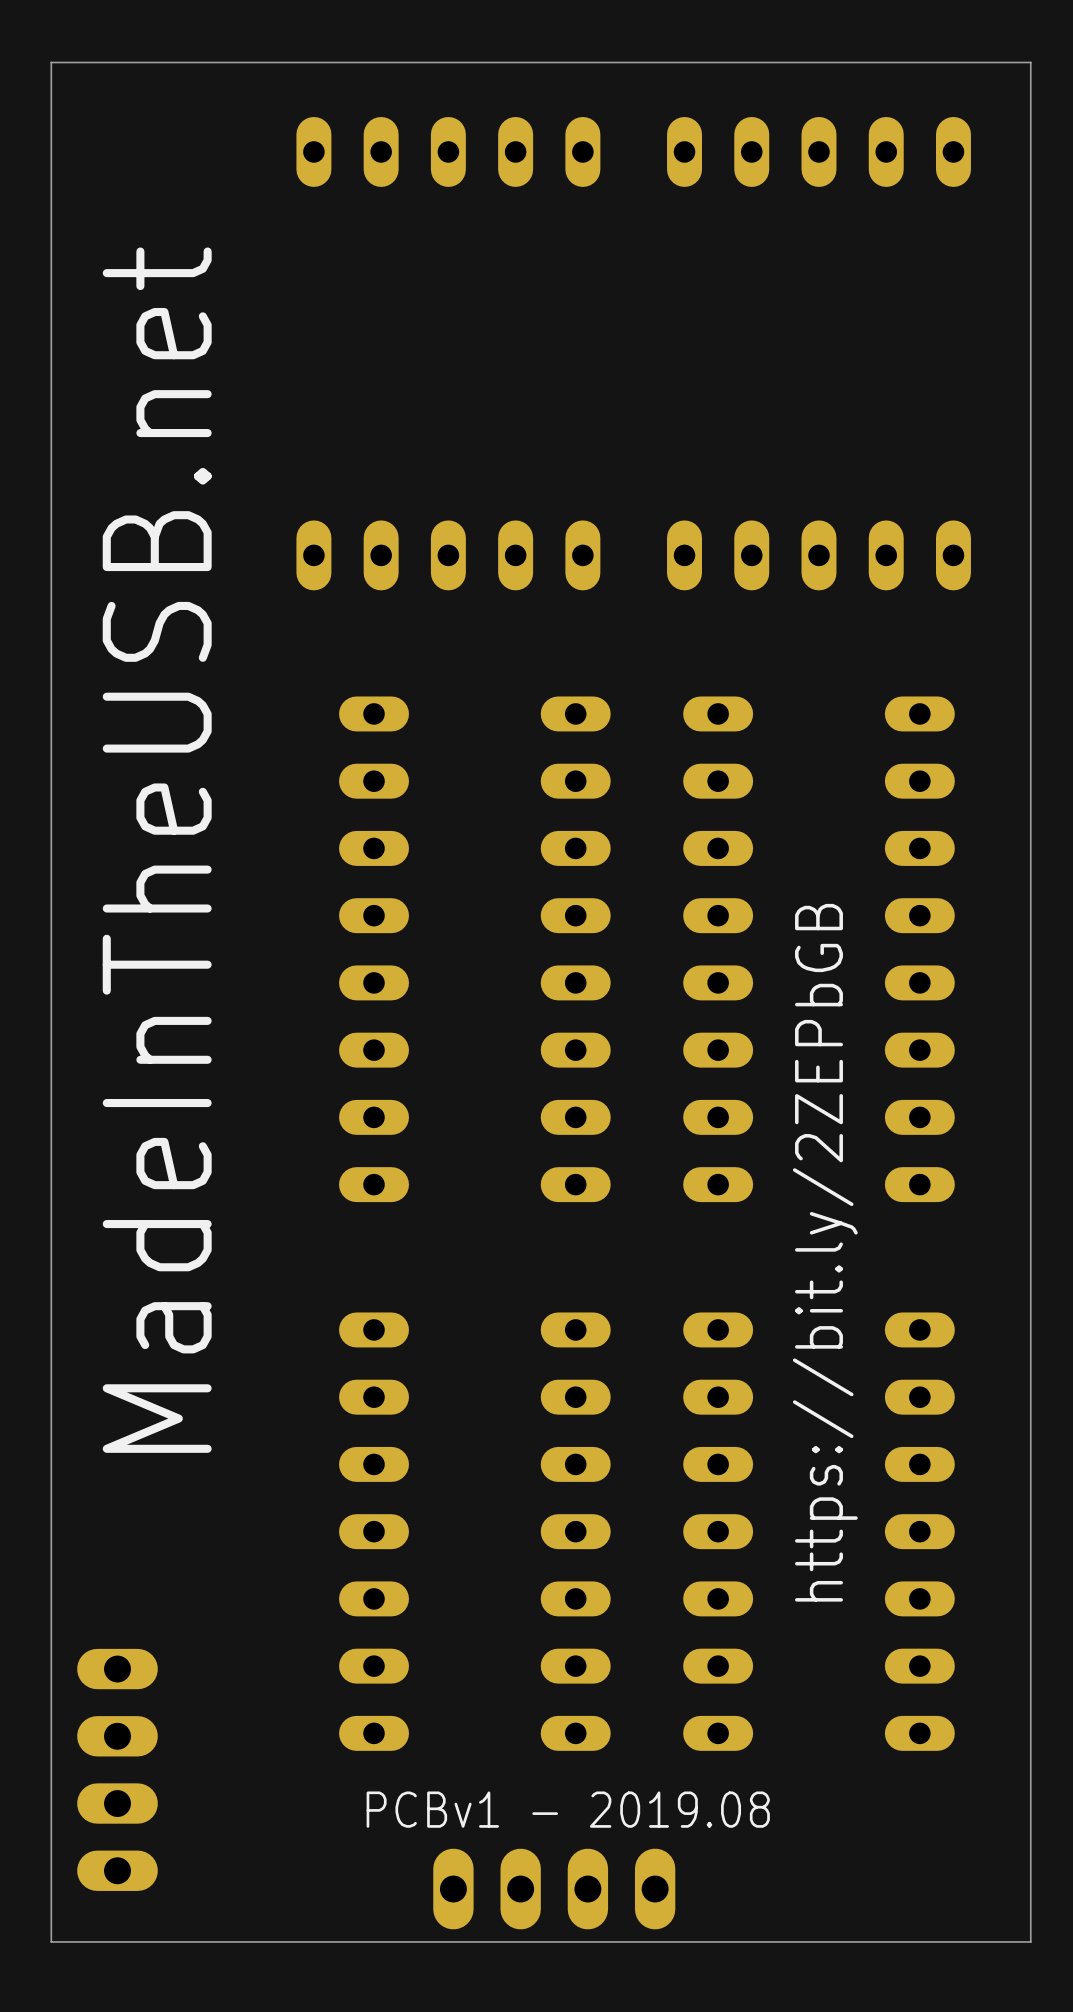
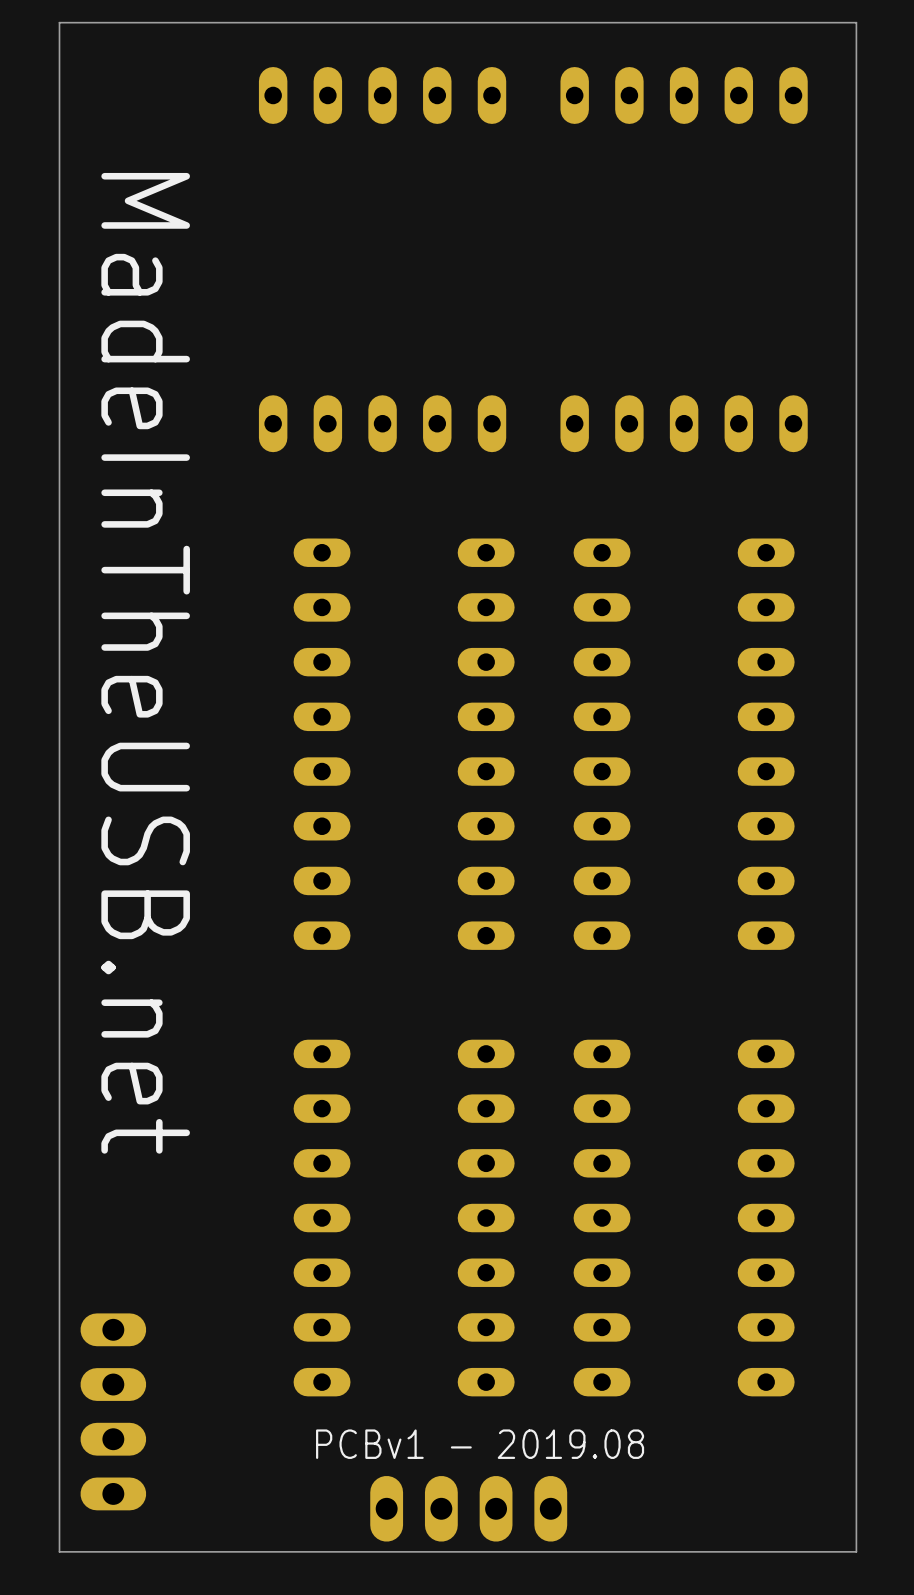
text rotation: 0° (157, 850) -> 180° (145, 663)
text: https://bit.ly/2ZEPbGB (825, 1252) -> none

